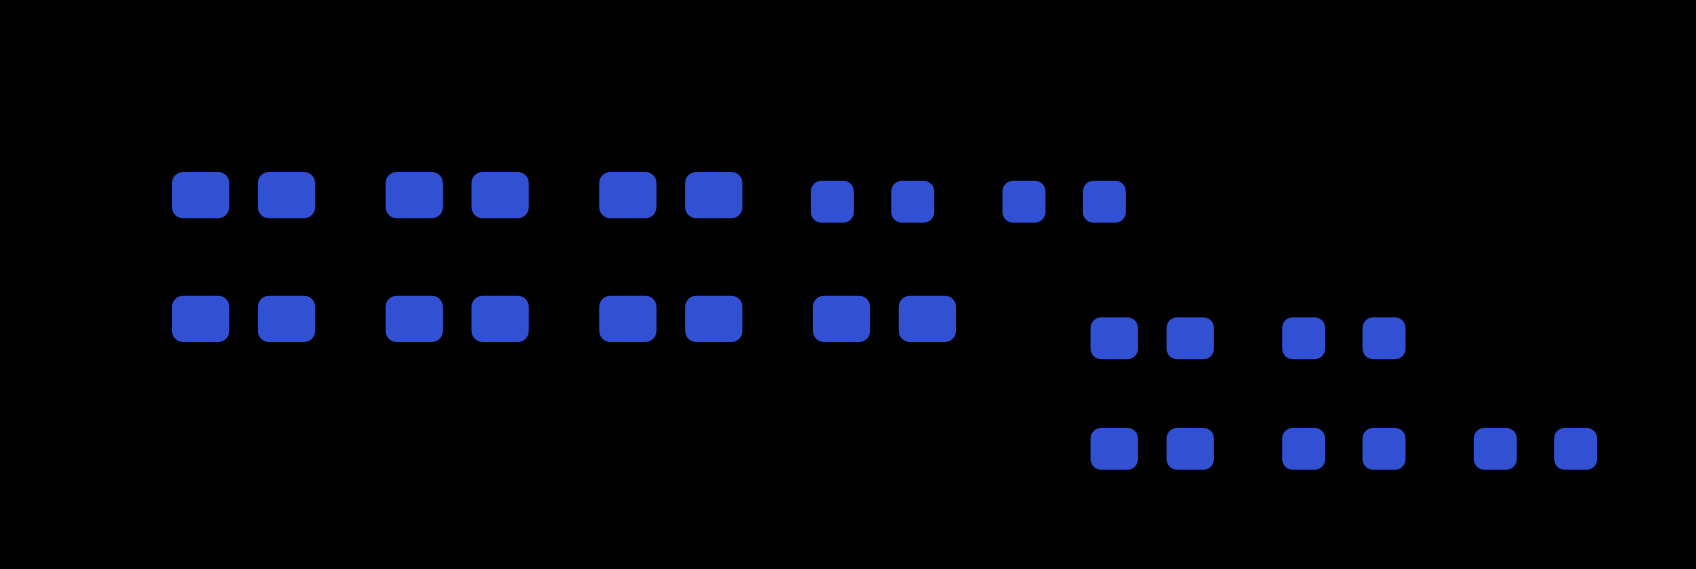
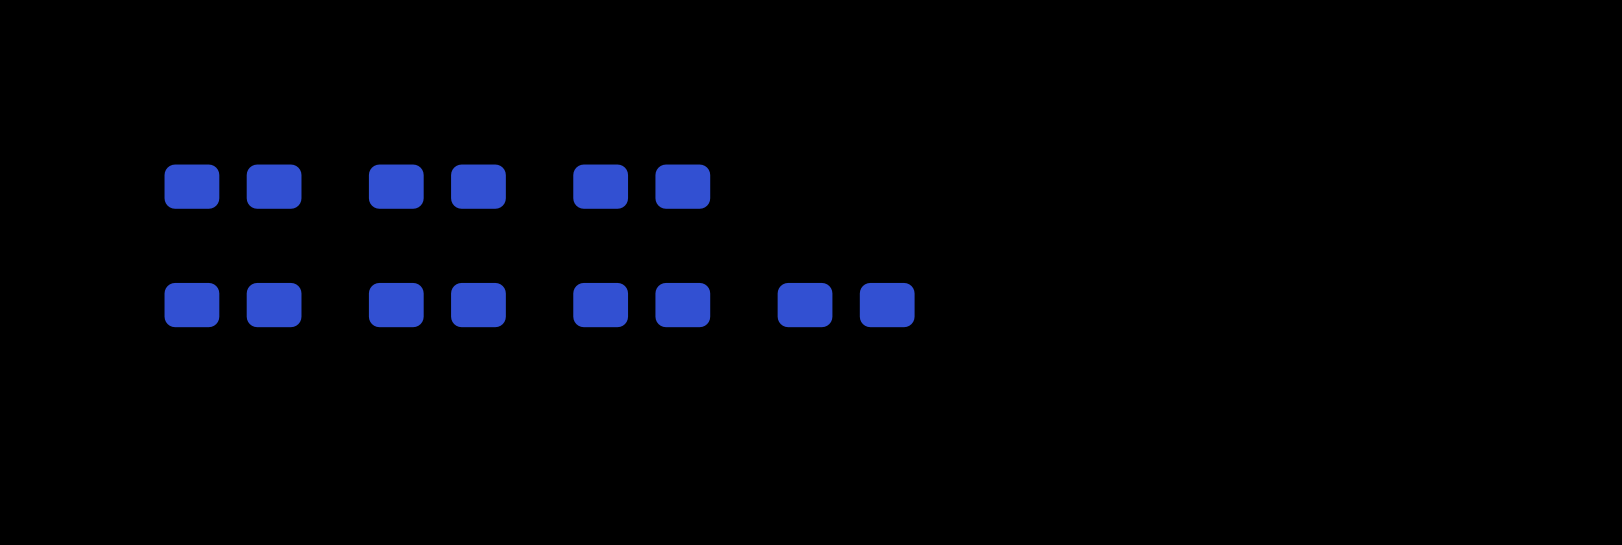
part: (872, 201) -> none
part: (1064, 201) -> none
part: (1152, 338) -> none
part: (1343, 338) -> none
part: (1152, 448) -> none
part: (1343, 448) -> none
part: (1535, 448) -> none

